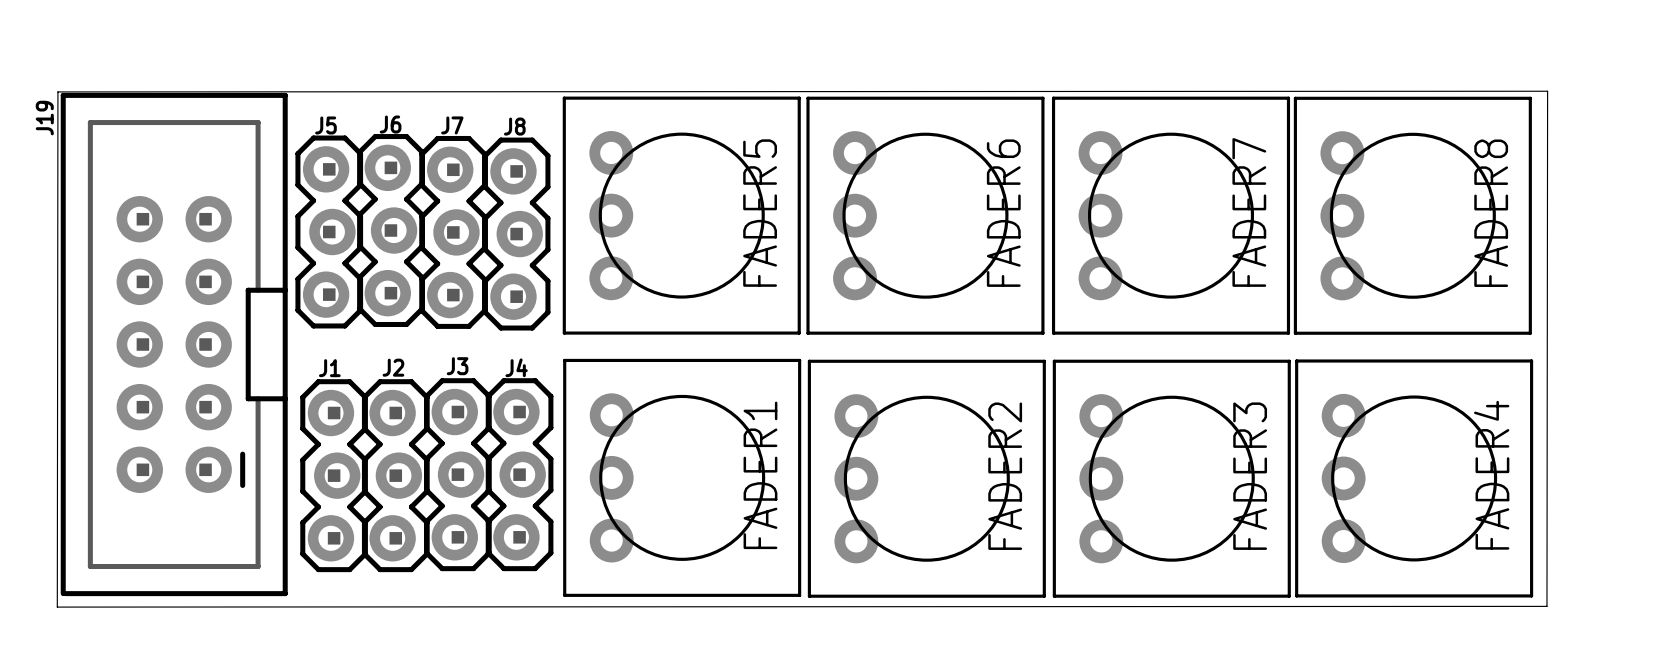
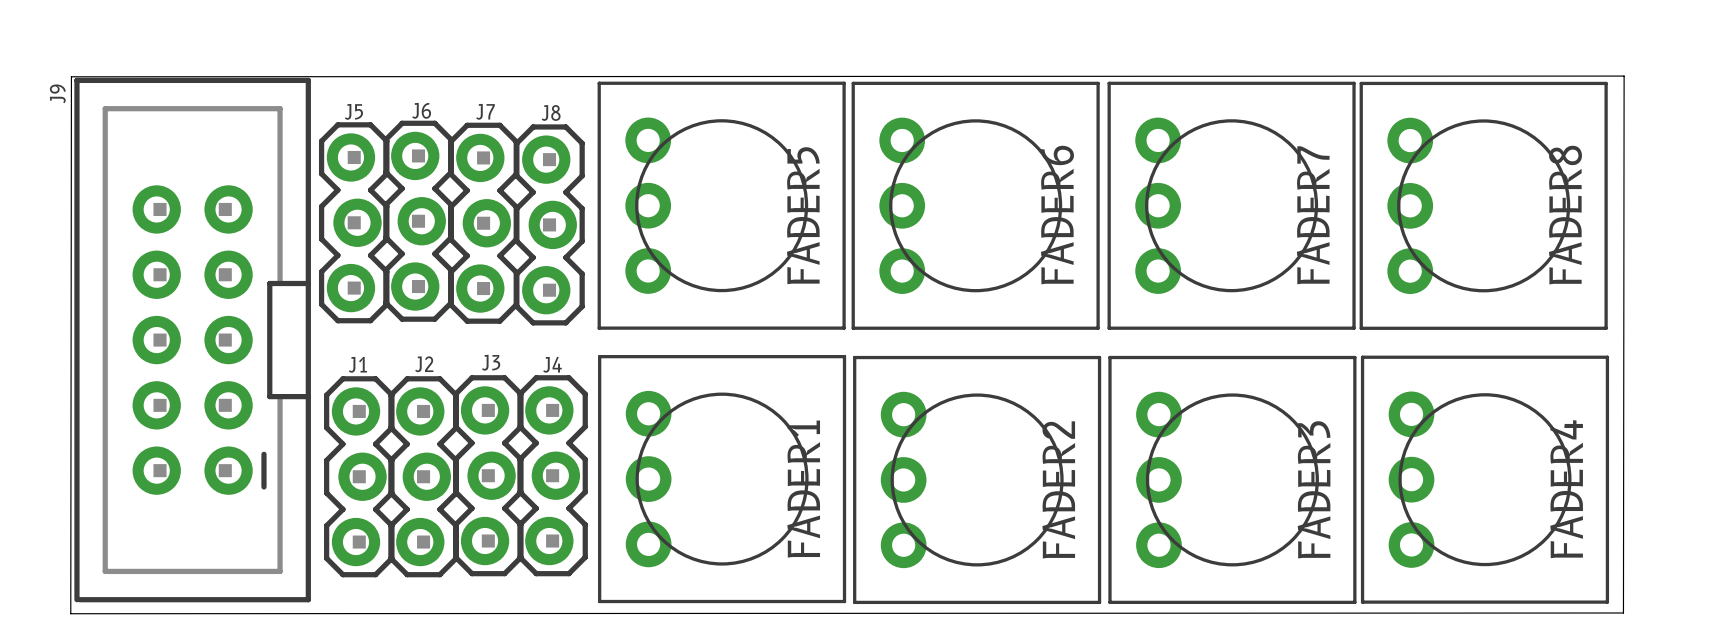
J19 name: J19 (44, 118) -> J9 (57, 93)

